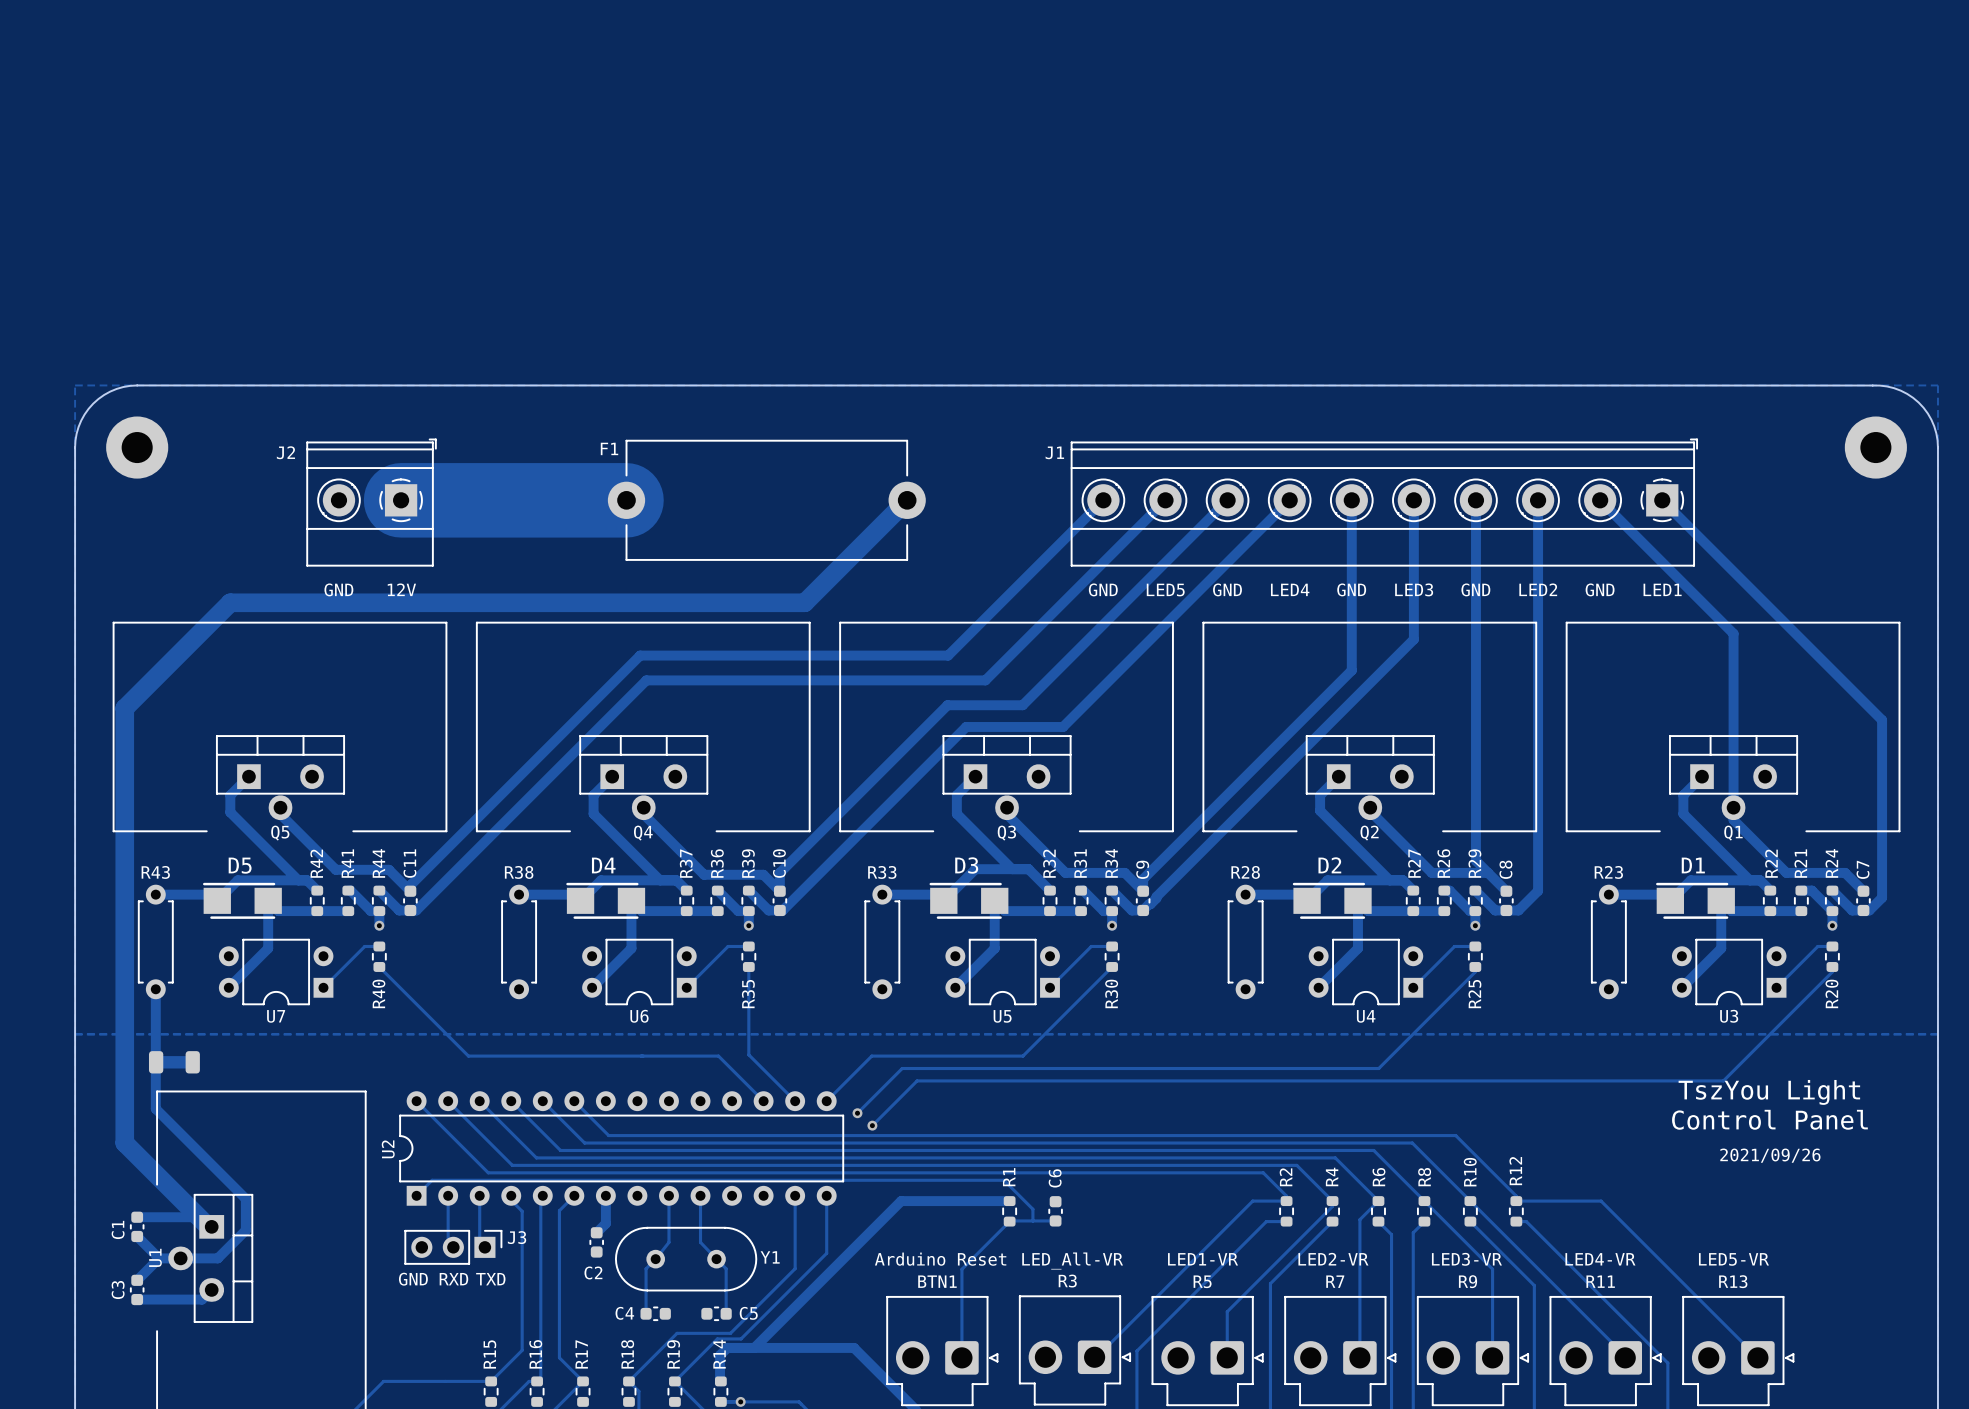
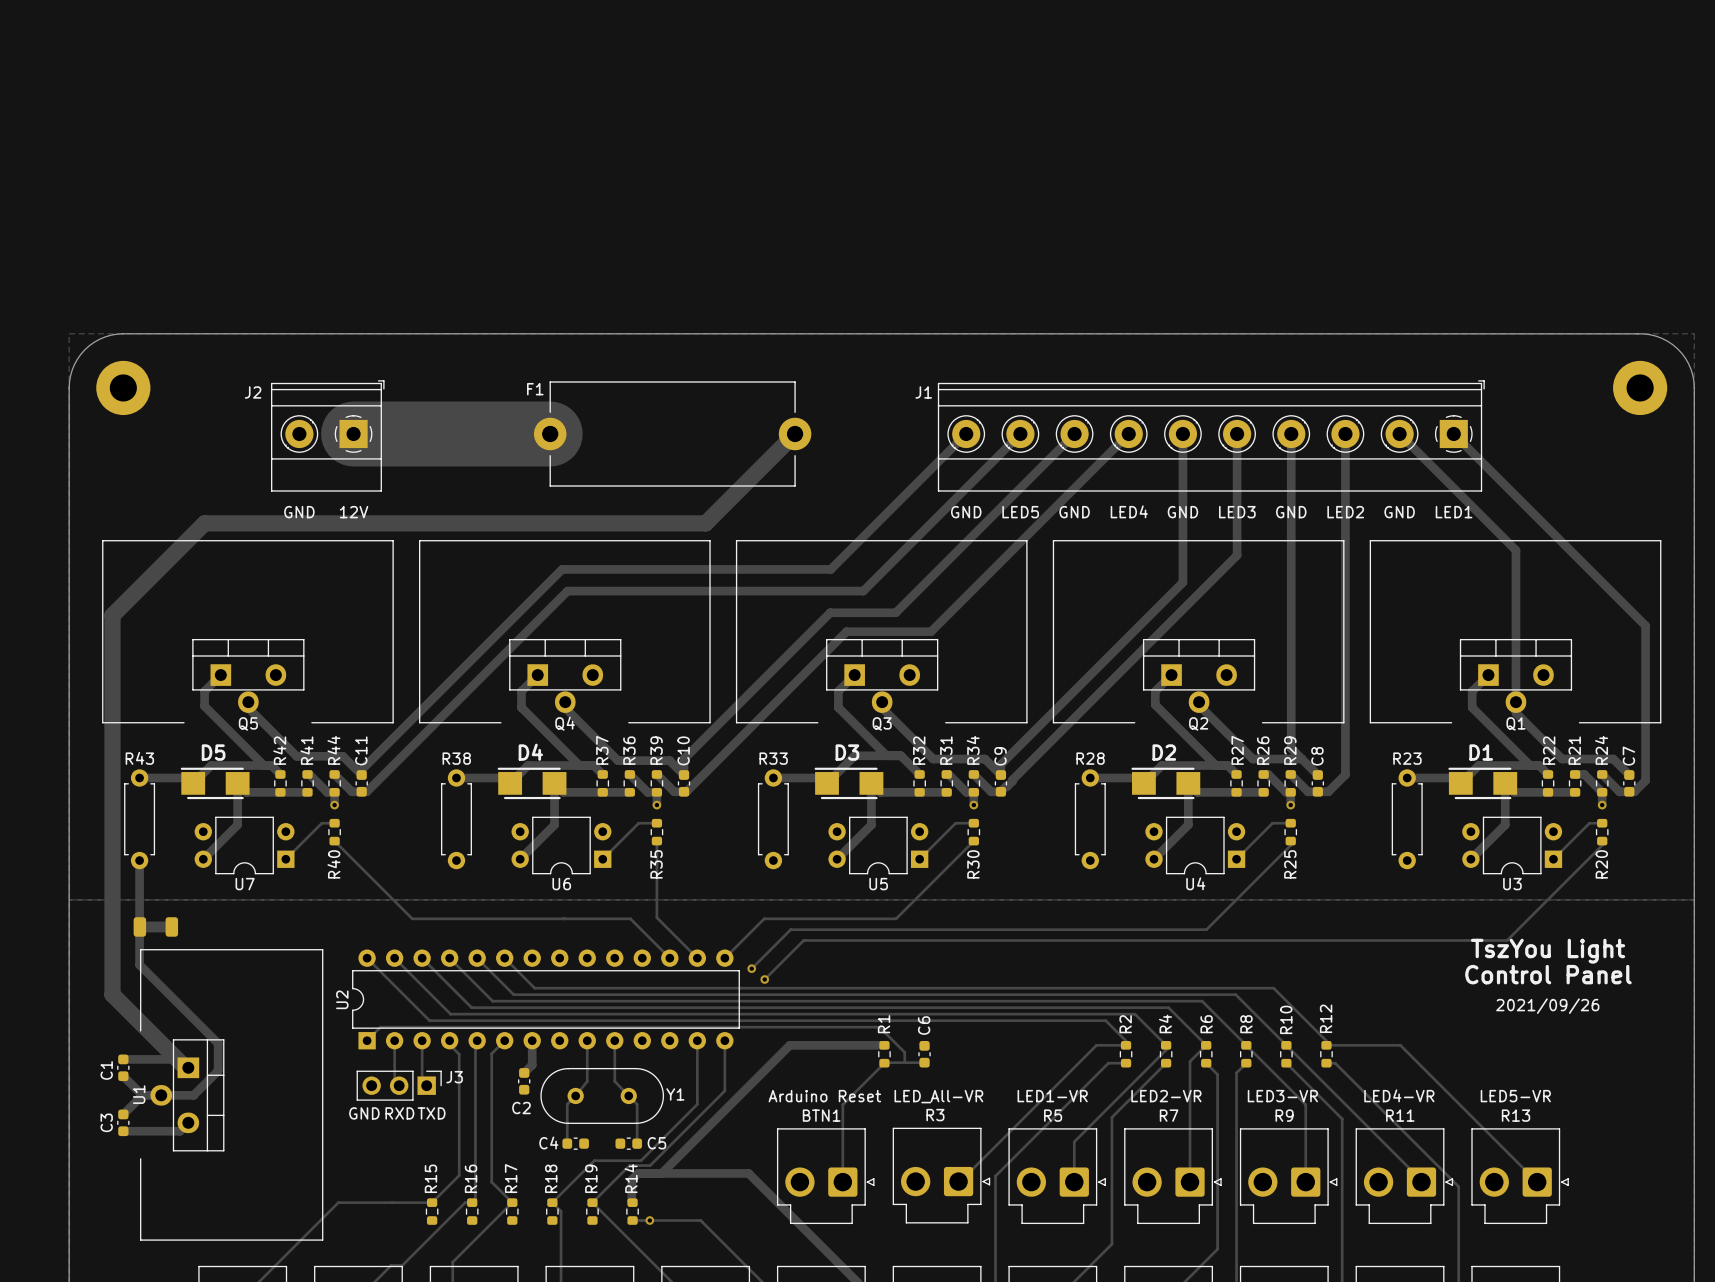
part footprint: [148, 1051, 200, 1074] -> [133, 917, 179, 937]

